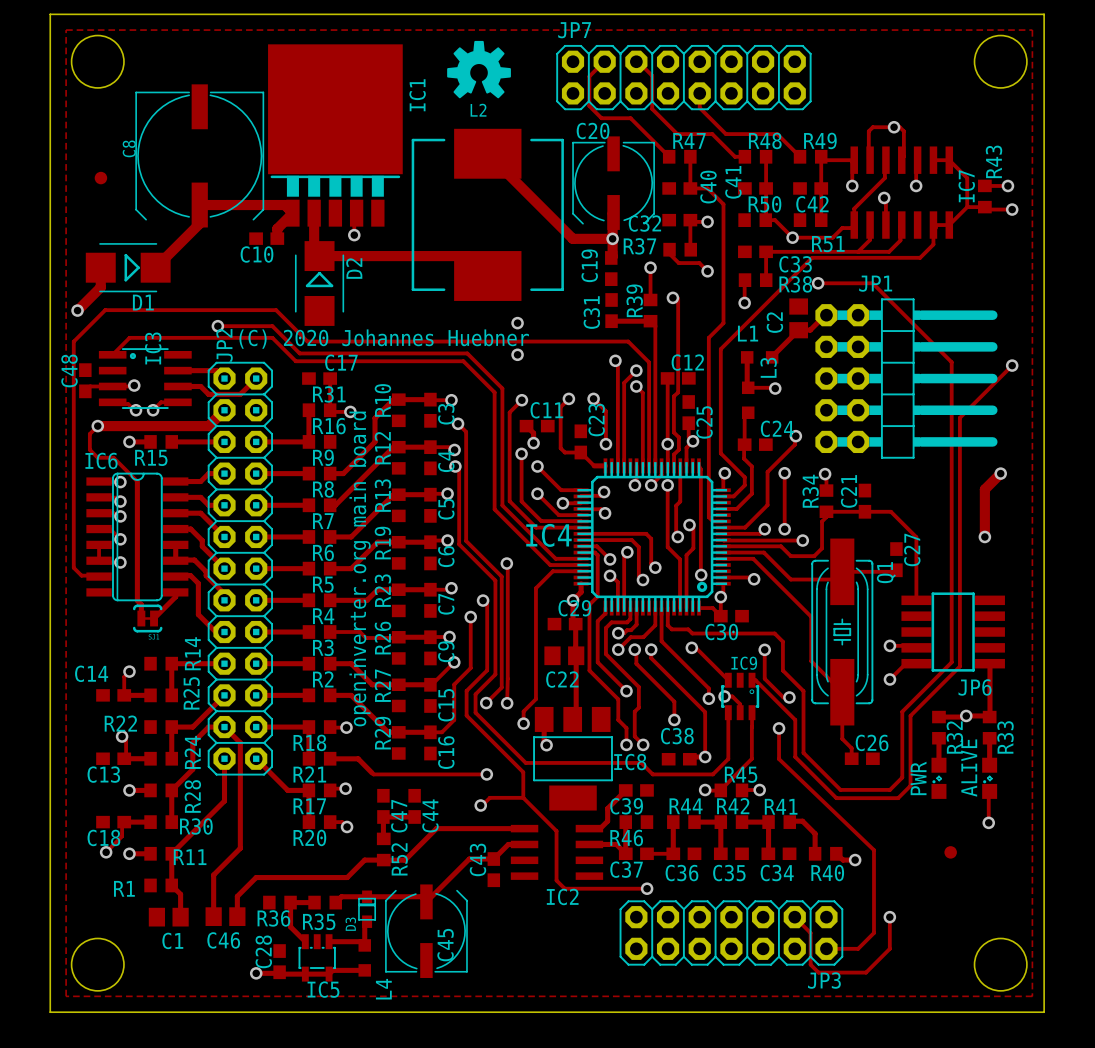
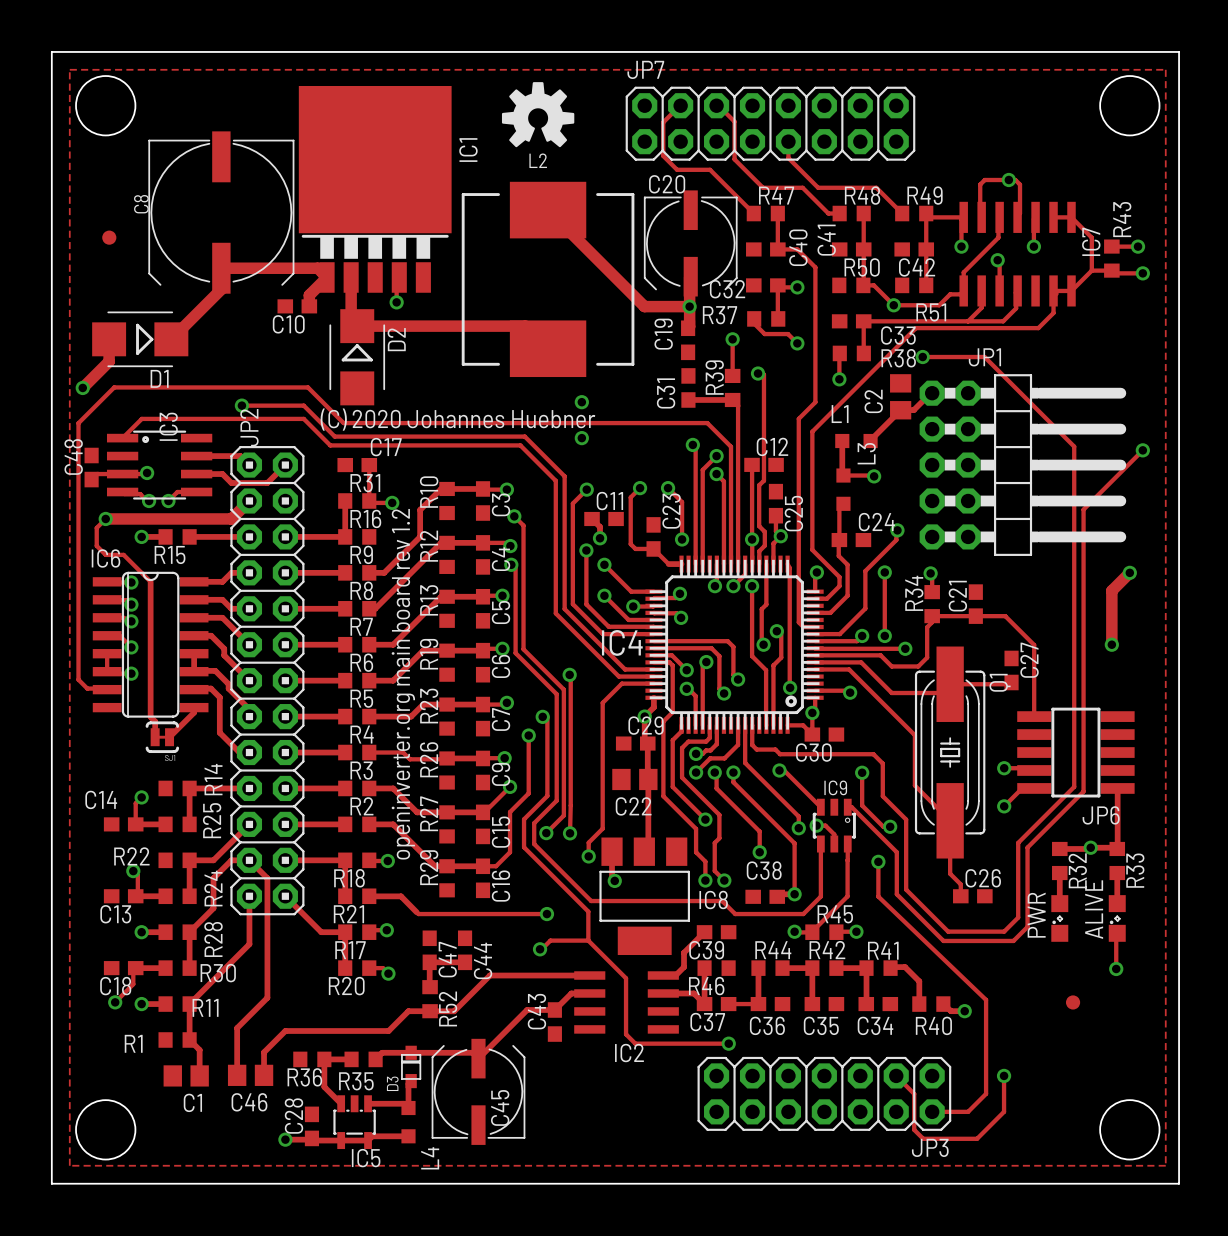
text: openinverter.org main board (360, 568) -> openinverter.org main board rev 1.2 (403, 684)

